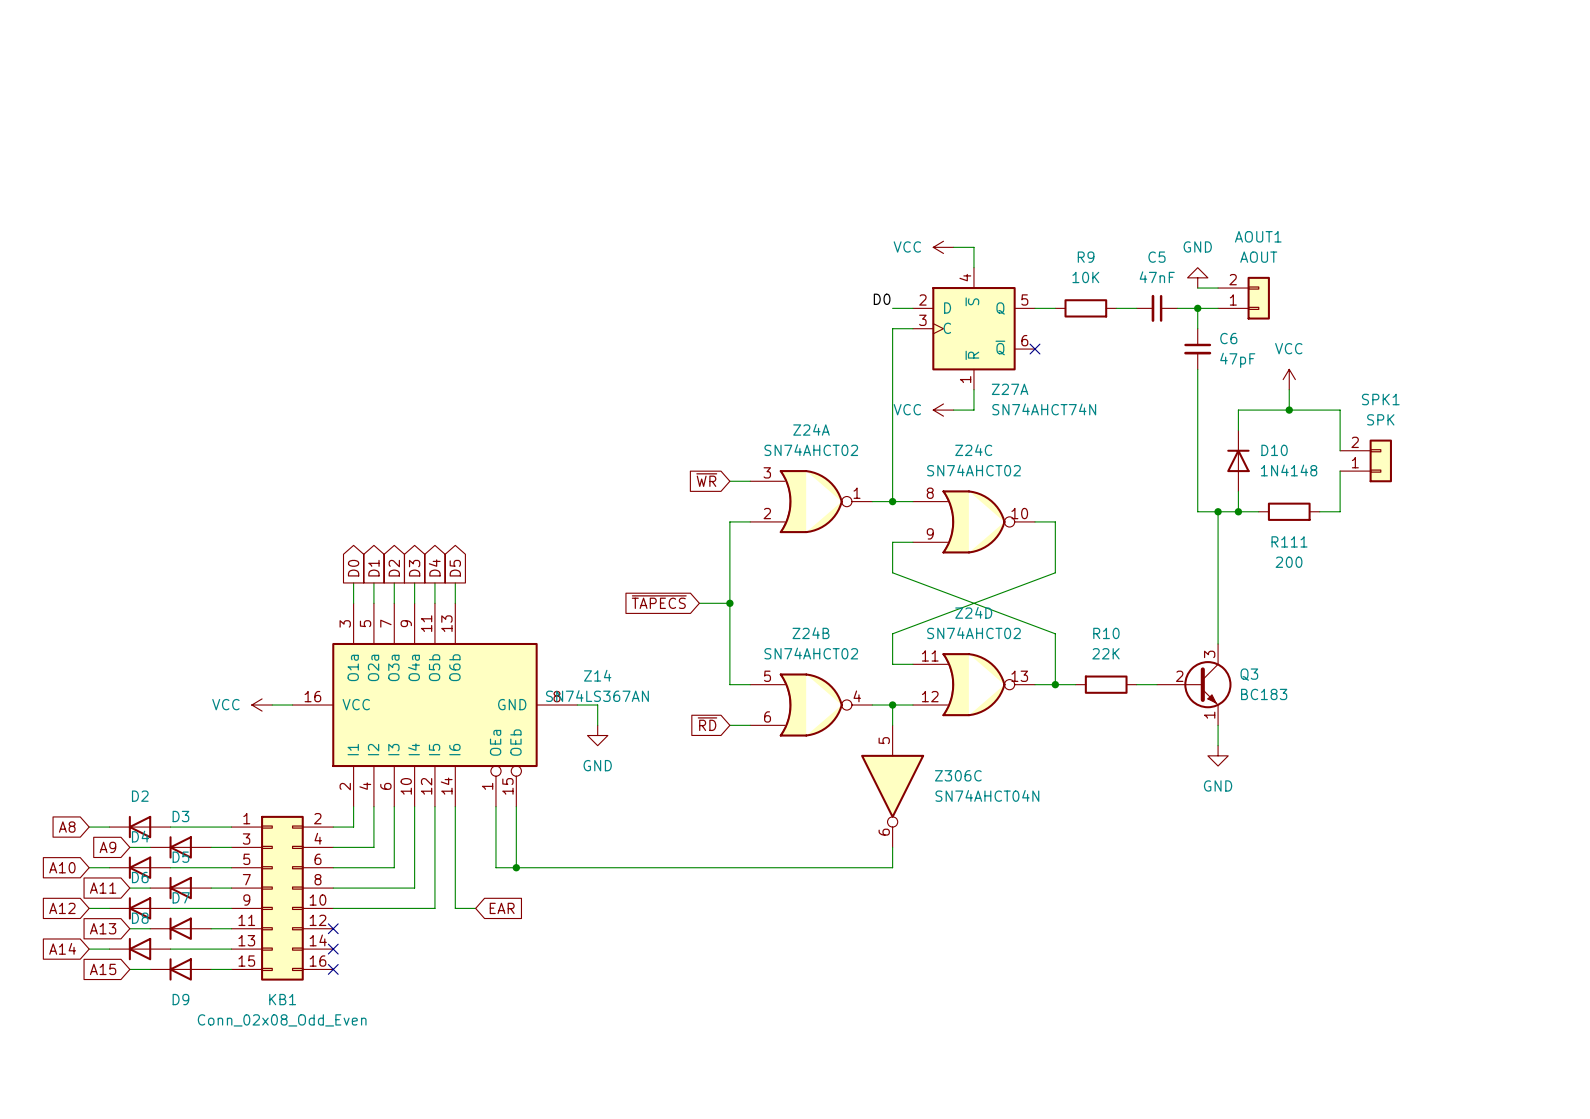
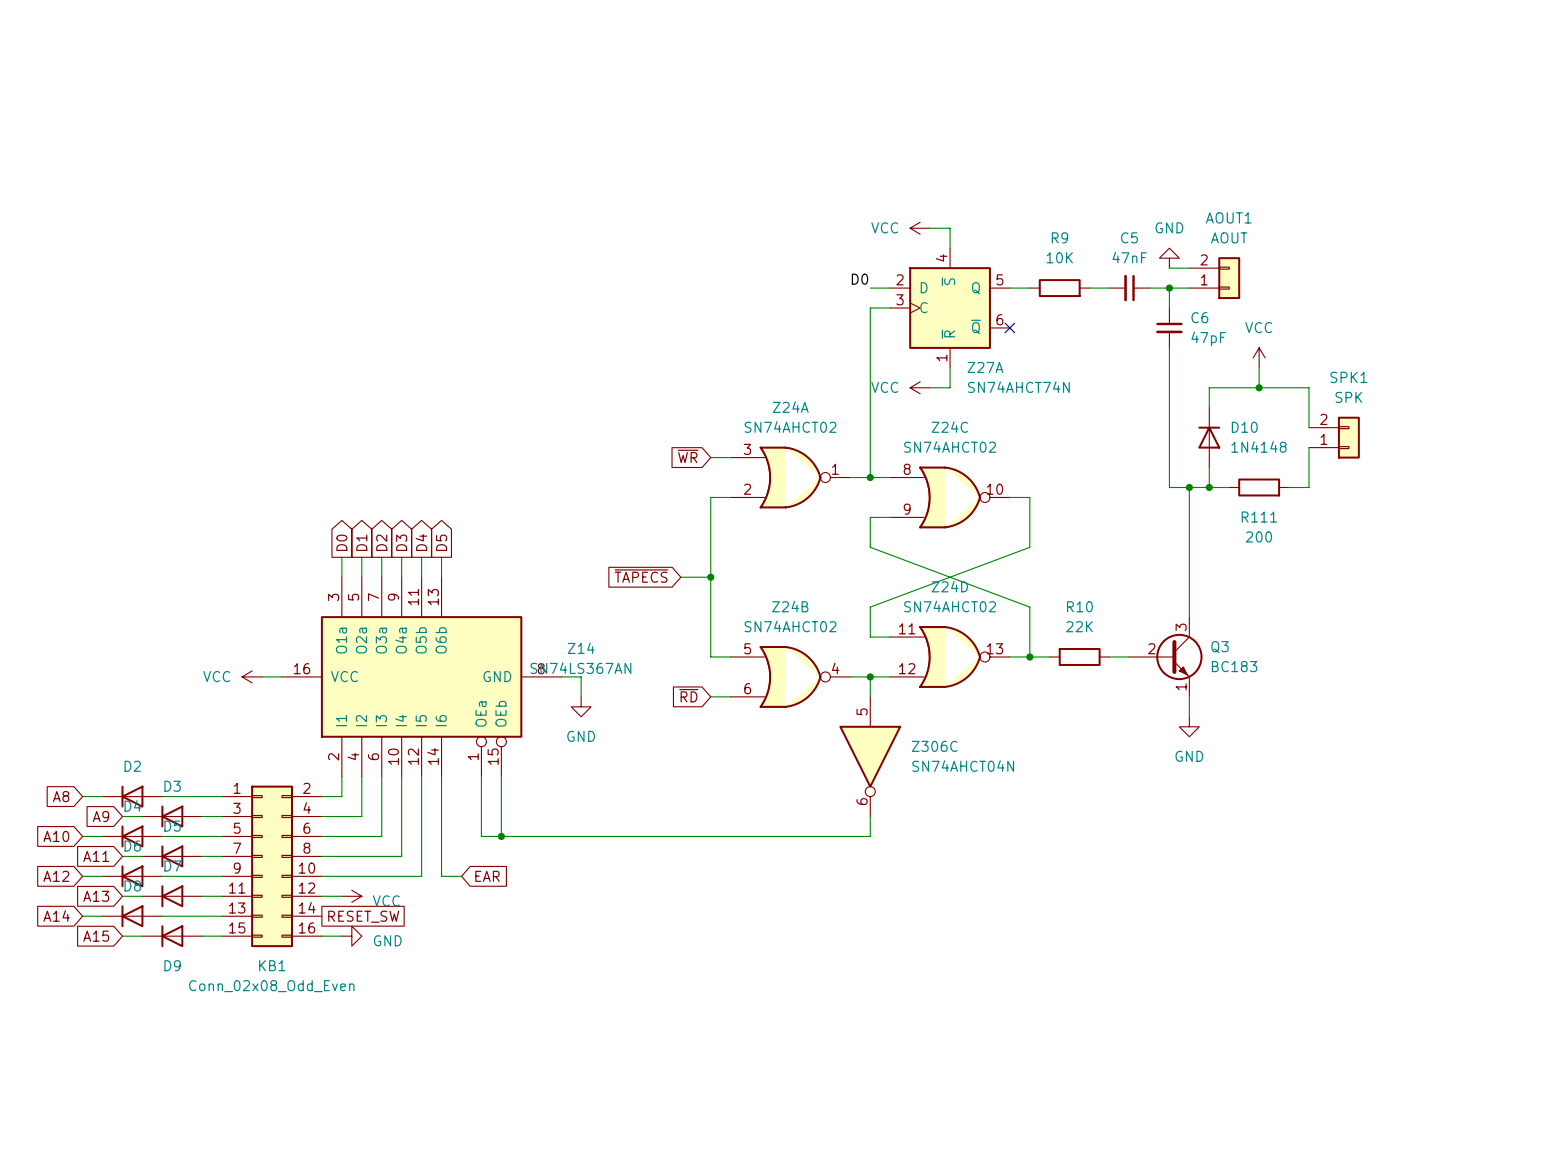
wire: none -> (321, 896) (341, 896)
no-connect mark: (333, 928) -> none
power symbol: none -> VCC (351, 896)
no-connect mark: (333, 949) -> none
global label: none -> RESET_SW (363, 916)
wire: none -> (321, 936) (341, 936)
no-connect mark: (333, 969) -> none
power symbol: none -> GND (351, 936)

